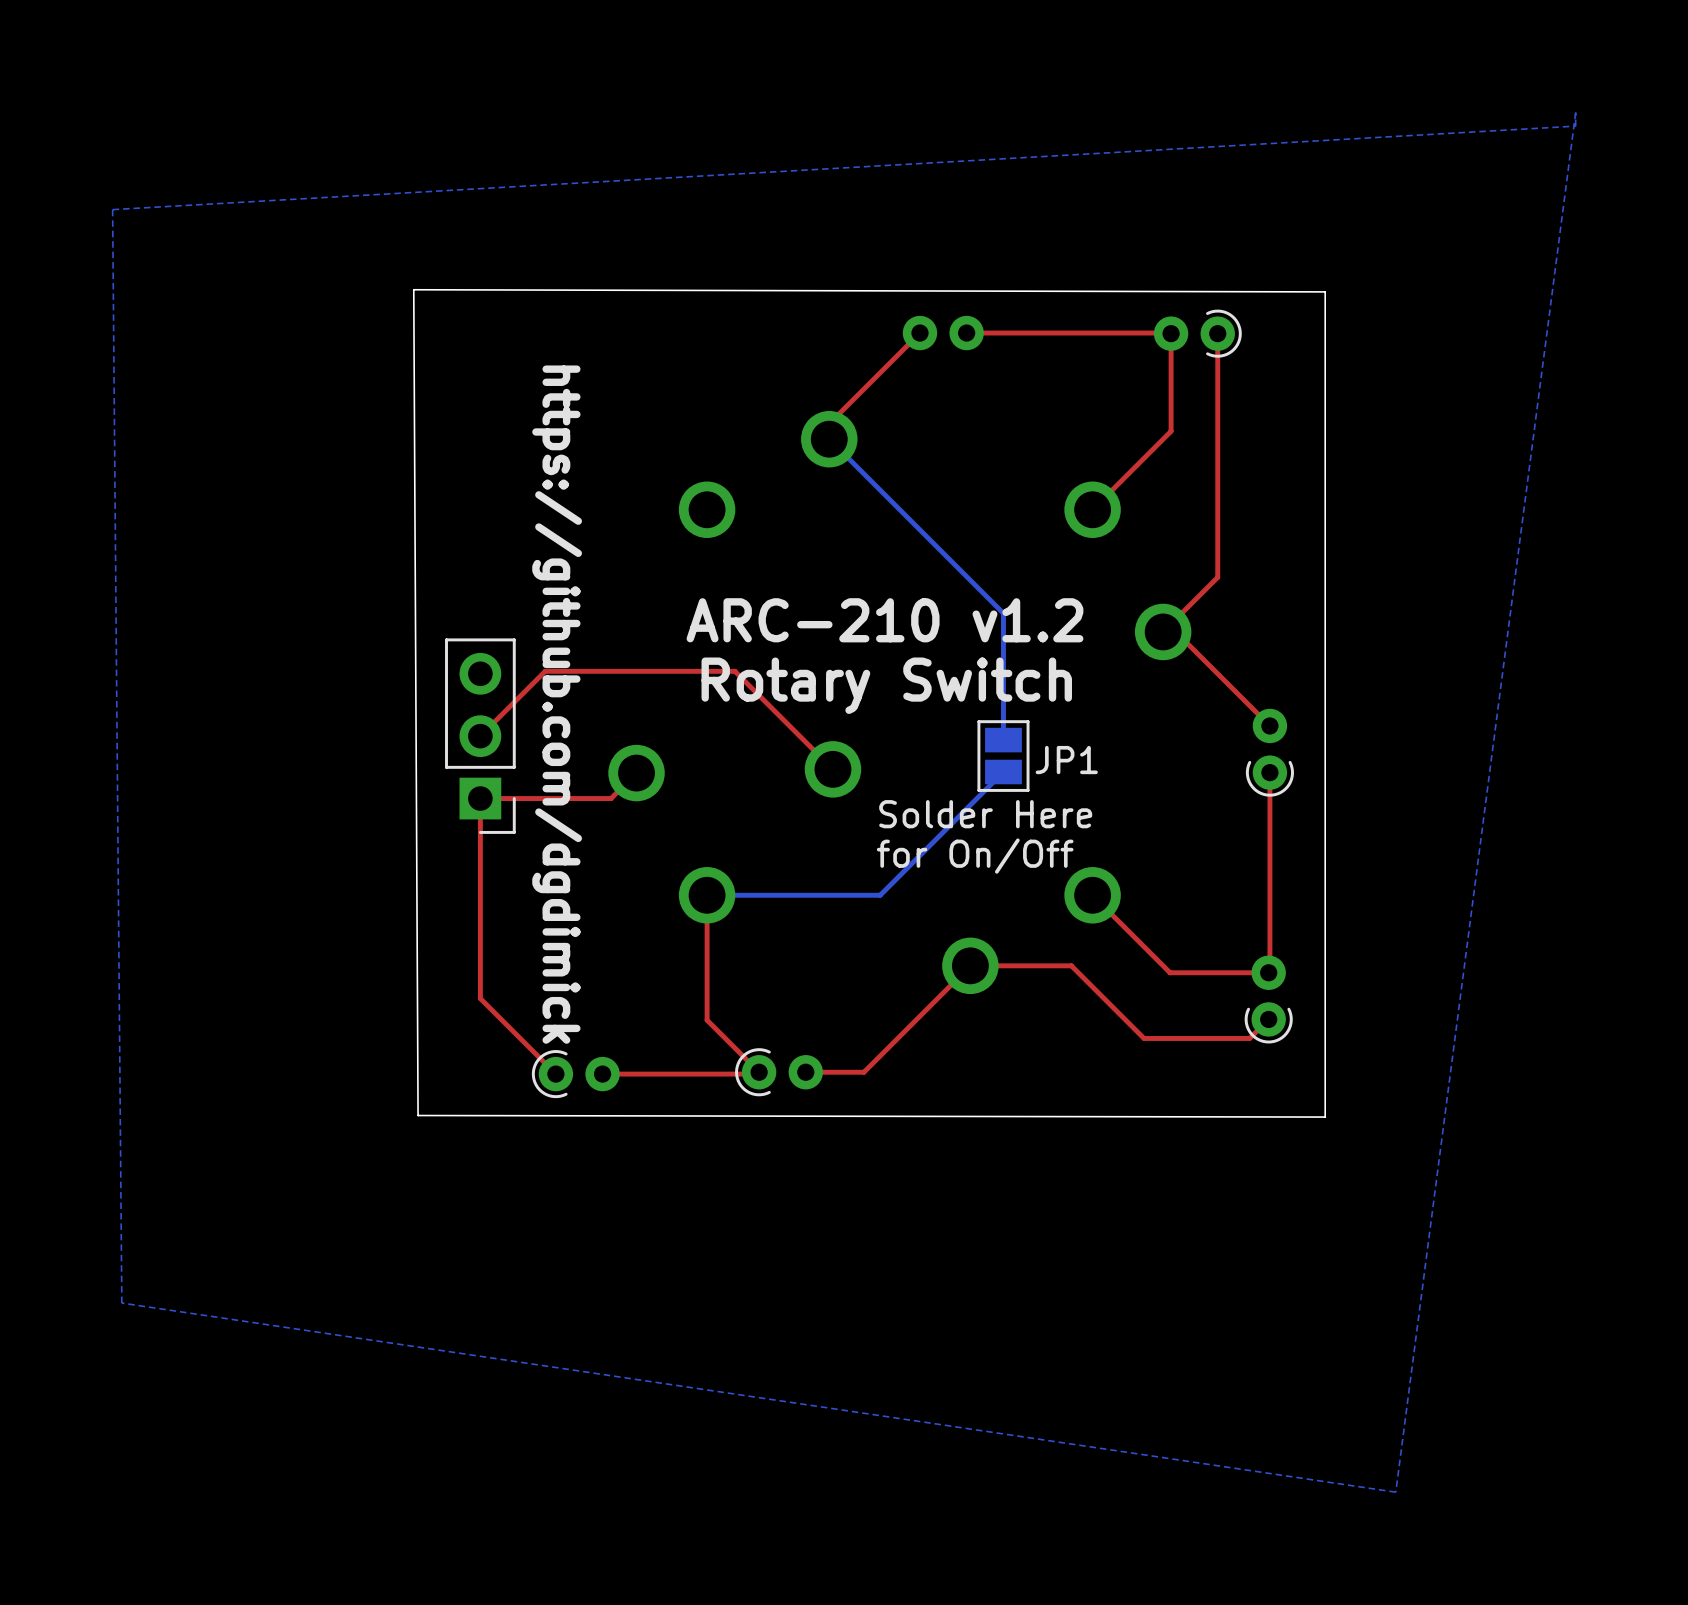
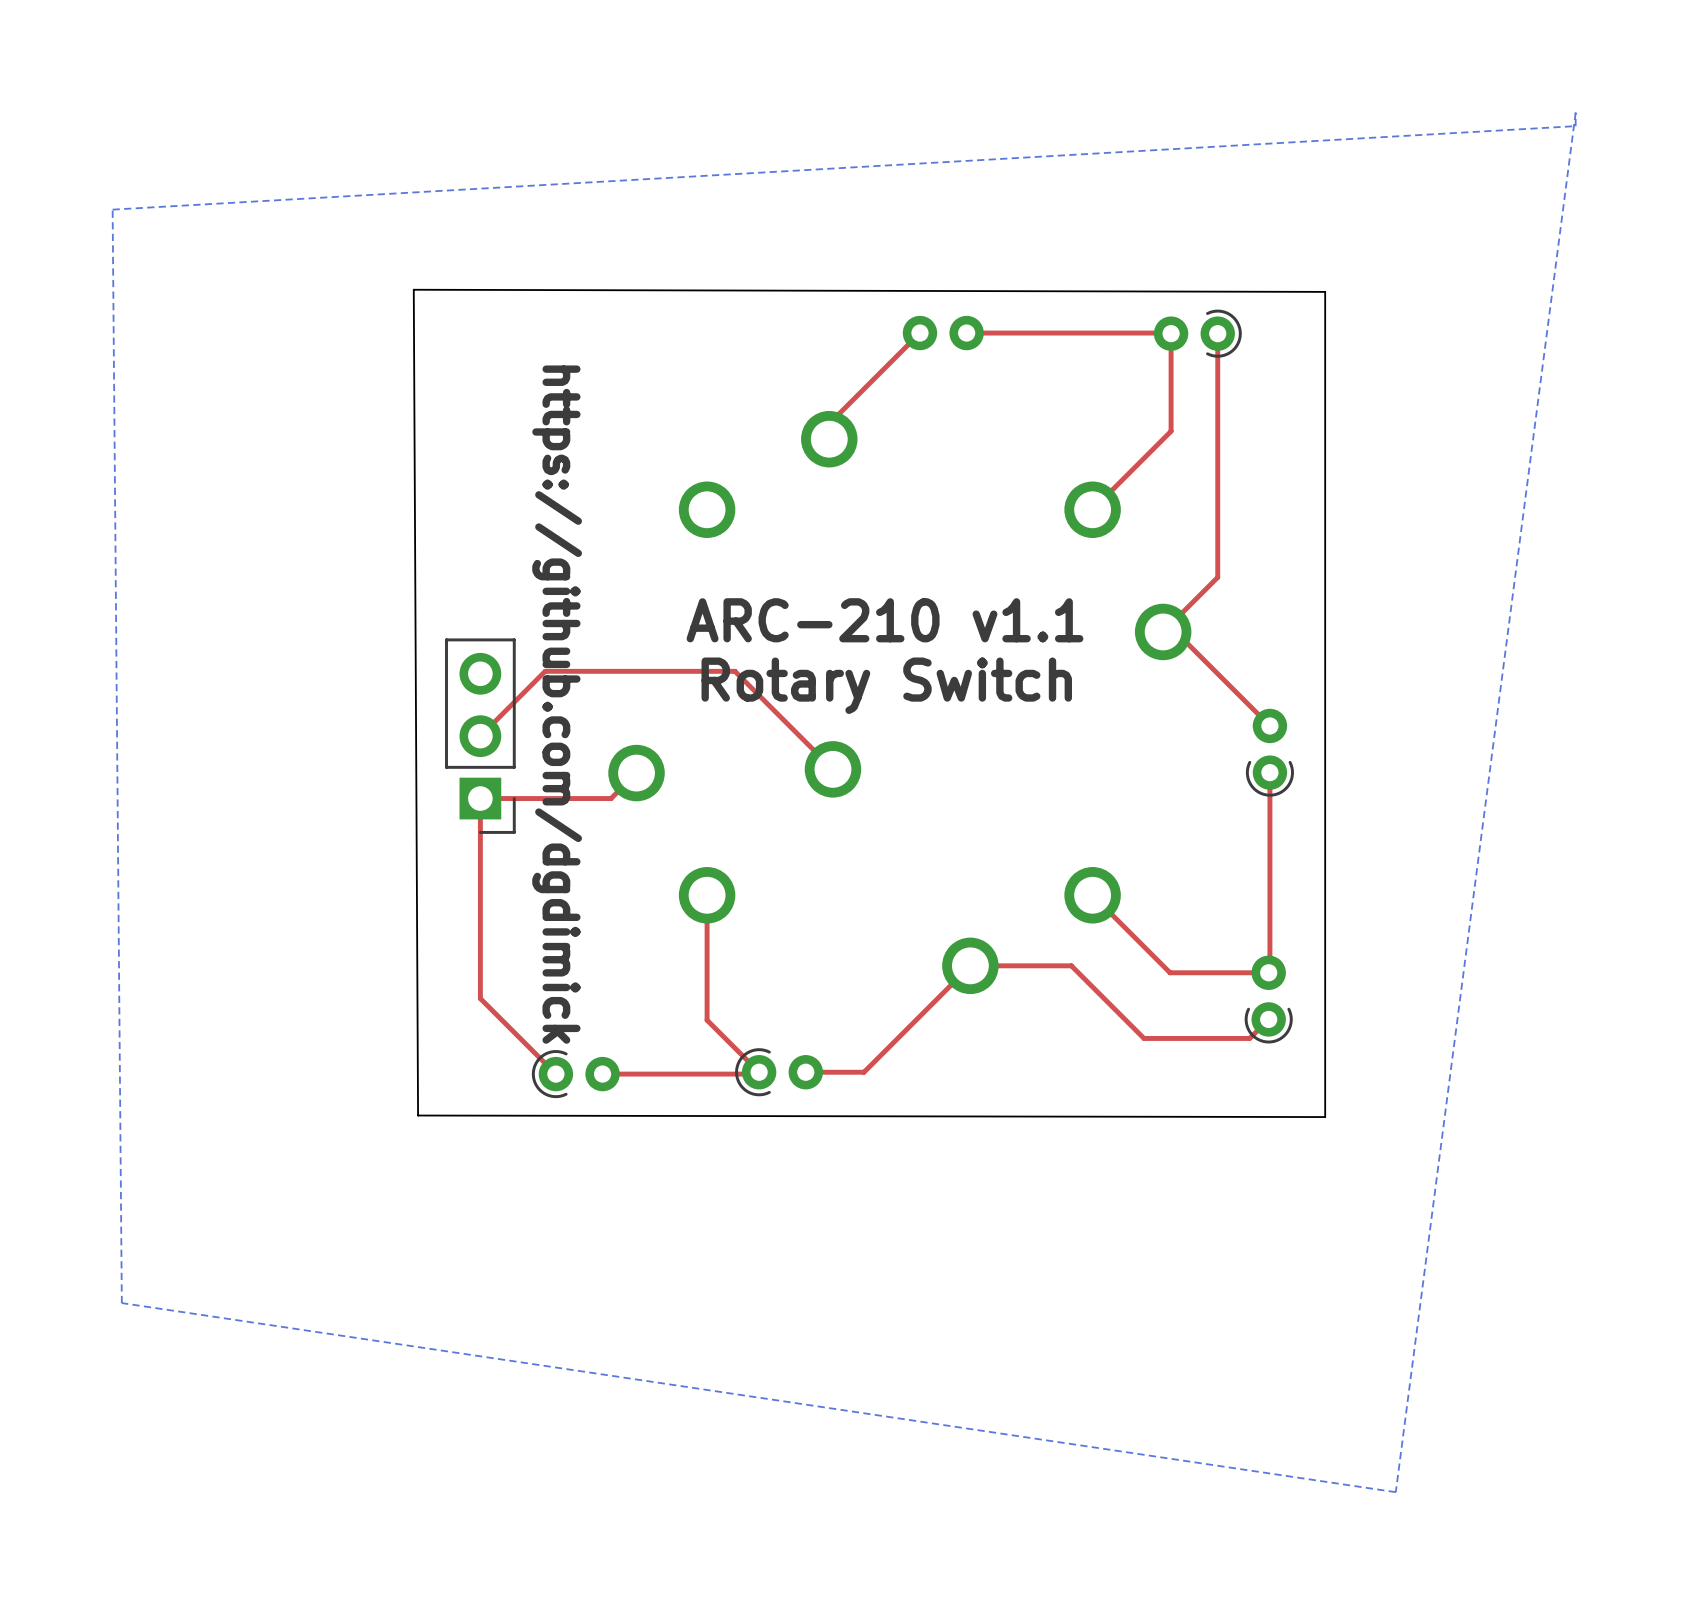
bottom track: (829, 439) (1003, 613) (1003, 740) -> none
text: ARC-210 v1.2 (884, 620) -> ARC-210 v1.1 (884, 620)
JP1: (1003, 756) -> none
bottom track: (1003, 772) (880, 895) (707, 895) -> none
text: Solder Here (985, 814) -> none
text: for On/Off (975, 856) -> none

